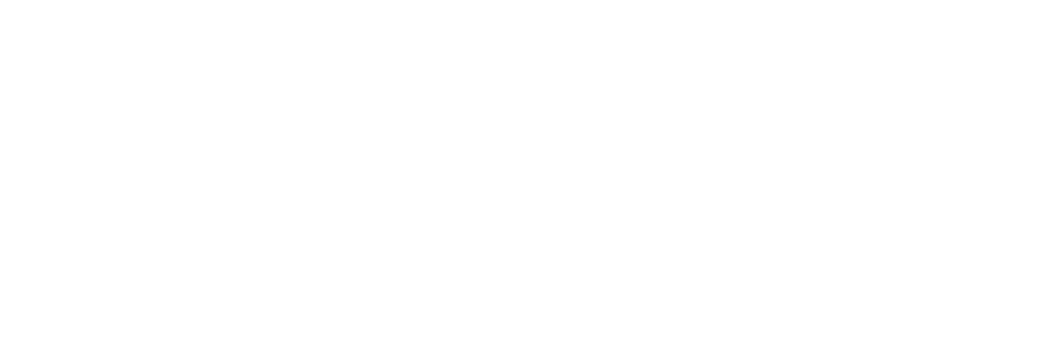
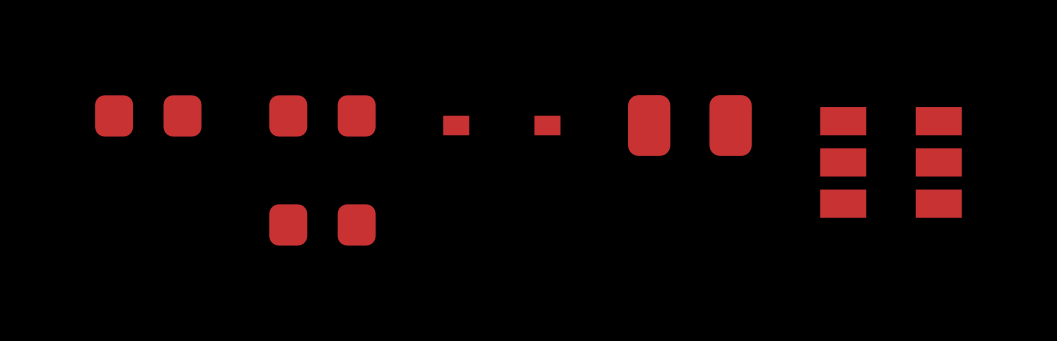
part: none -> (148, 115)
part: none -> (322, 115)
part: none -> (501, 125)
part: none -> (689, 125)
part: none -> (890, 162)
part: none -> (322, 224)

